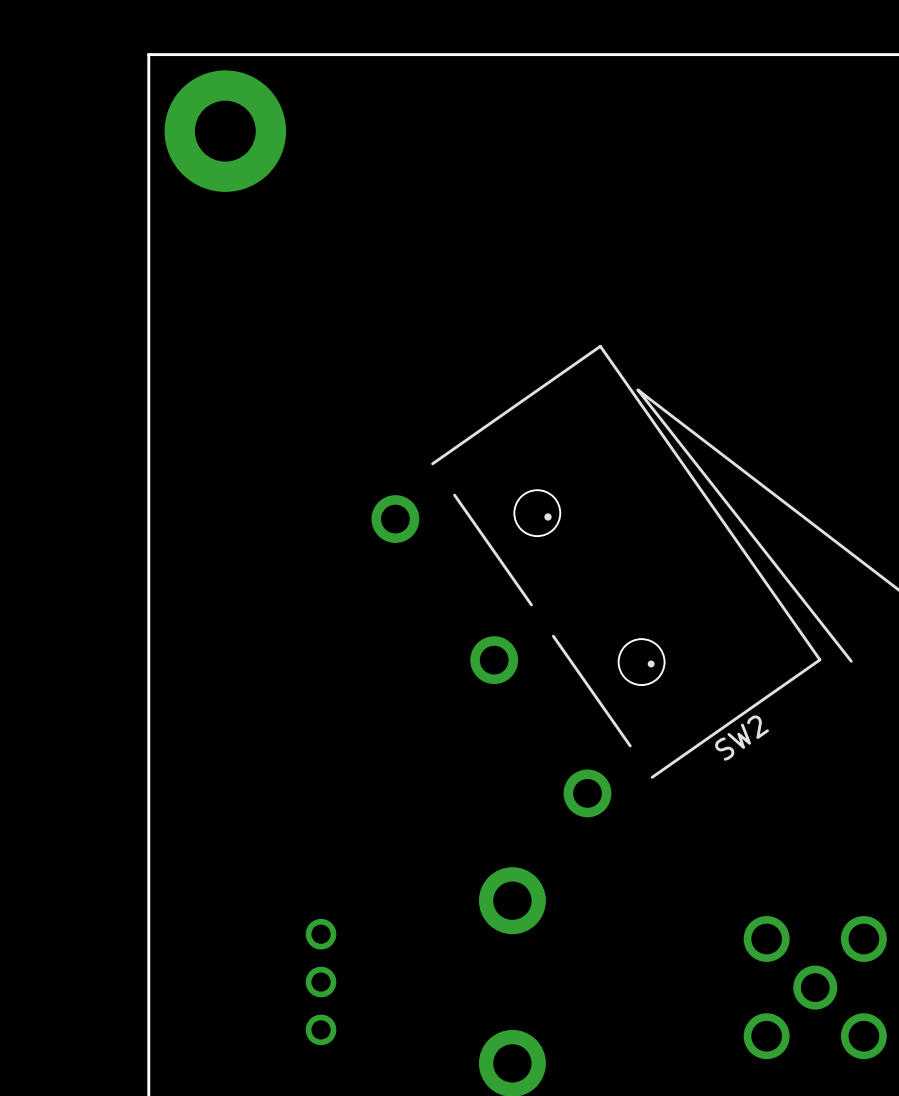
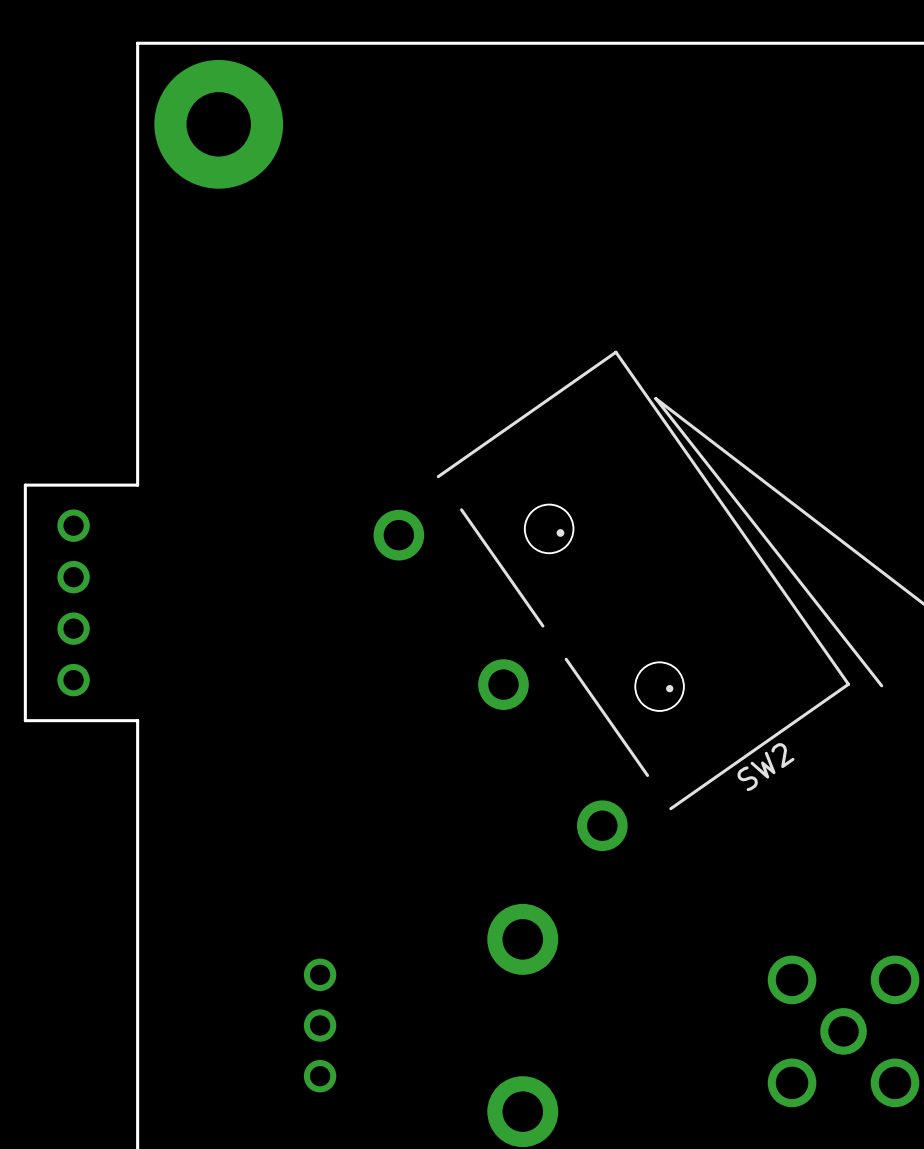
board edge: (148, 471) (148, 694) -> (137, 485) (25, 485) (25, 720) (137, 720)
part: none -> (73, 602)

